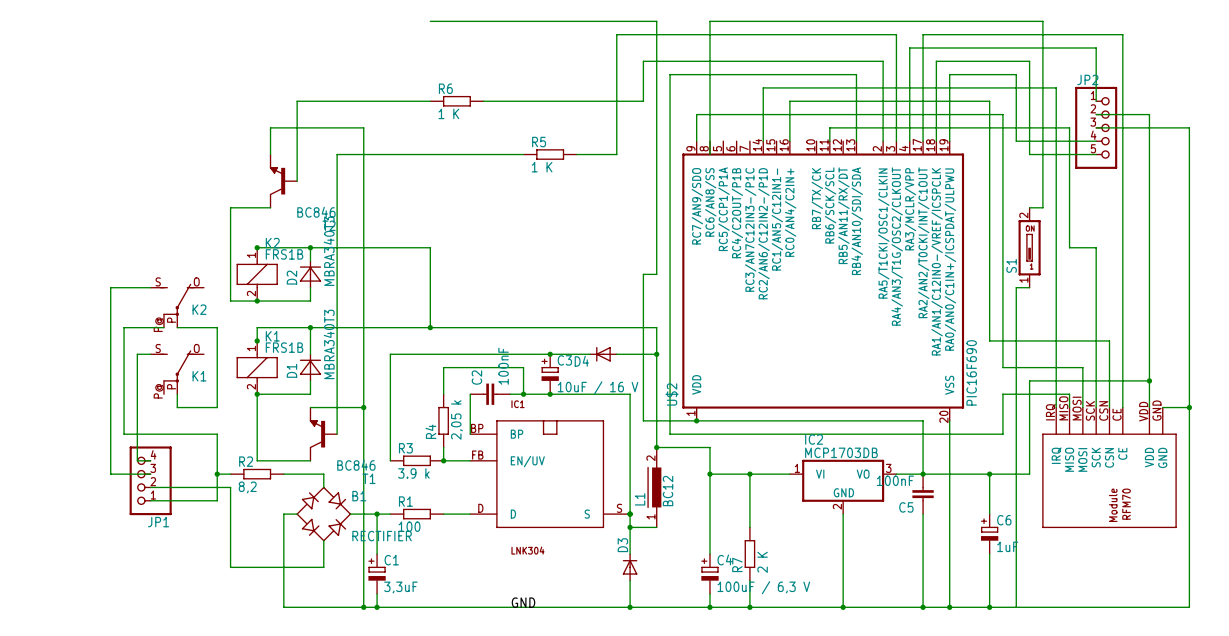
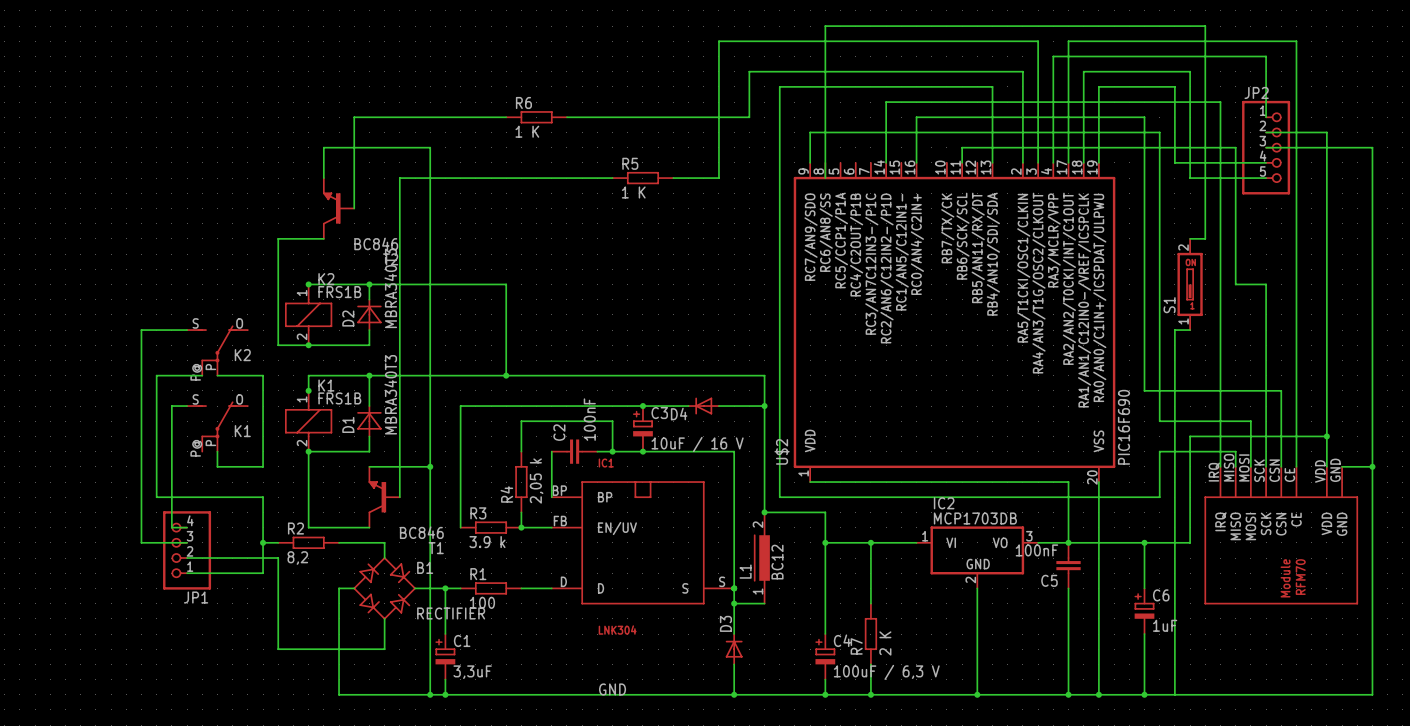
wire: (430, 21) (656, 21) (656, 274) (643, 274) (643, 420) (696, 420) -> none
junction: (696, 420) -> none

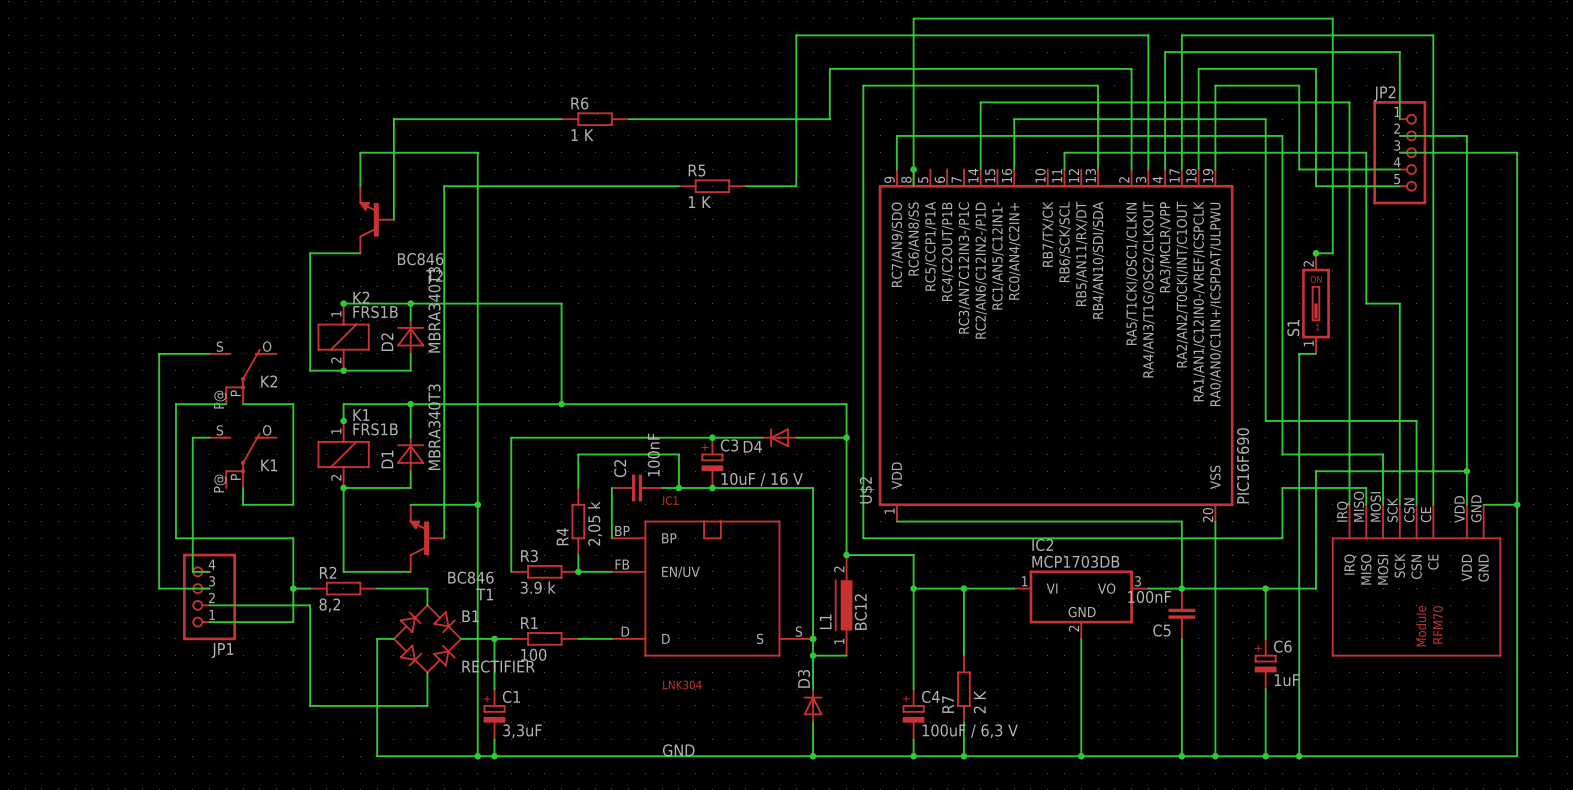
junction: none -> (913, 169)
junction: none -> (1315, 253)
junction: none -> (1299, 756)

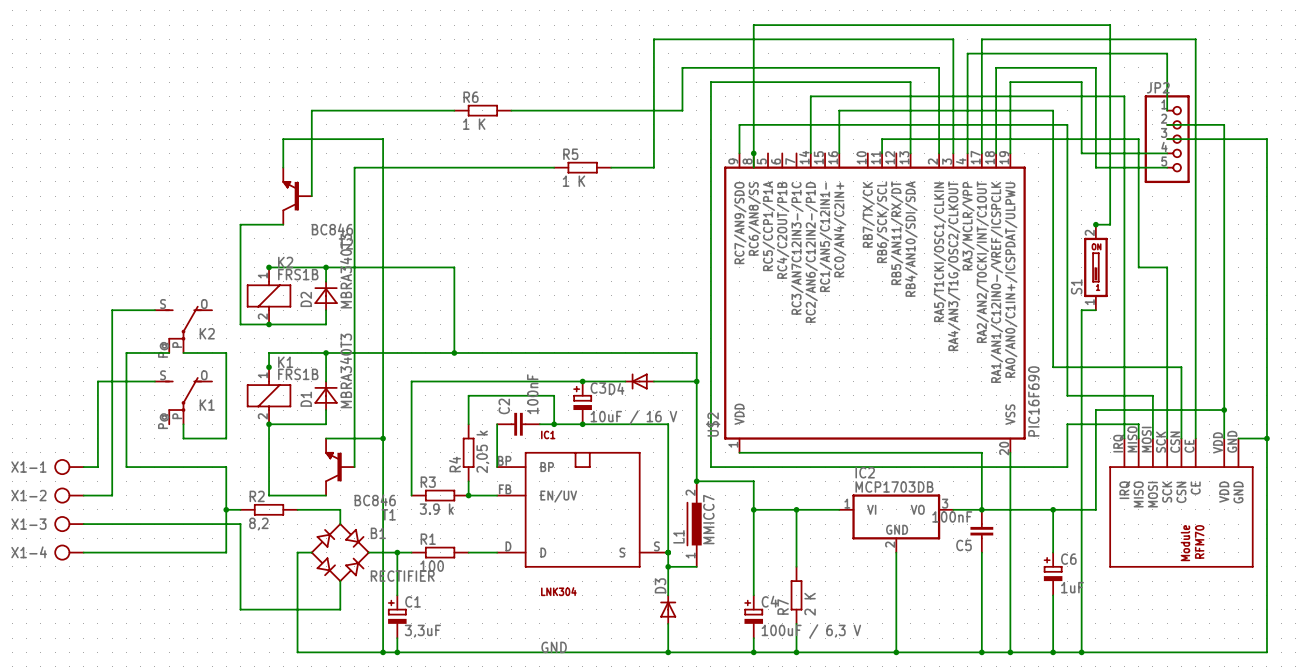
wire: (192, 437) (192, 571) (209, 571) -> (140, 381) (97, 381) (97, 467) (83, 467)
X1-1: none -> (69, 467)
X1-2: none -> (69, 495)
wire: (159, 571) (159, 588) (209, 588) -> (112, 495) (83, 495)
JP1: (209, 596) -> none
X1-3: none -> (69, 524)
wire: none -> (83, 524) (154, 524)
L1 value: BC12 (860, 612) -> MMICC7 (708, 519)
wire: (209, 622) (293, 622) -> (83, 552) (226, 552) (226, 538)
X1-4: none -> (69, 552)

